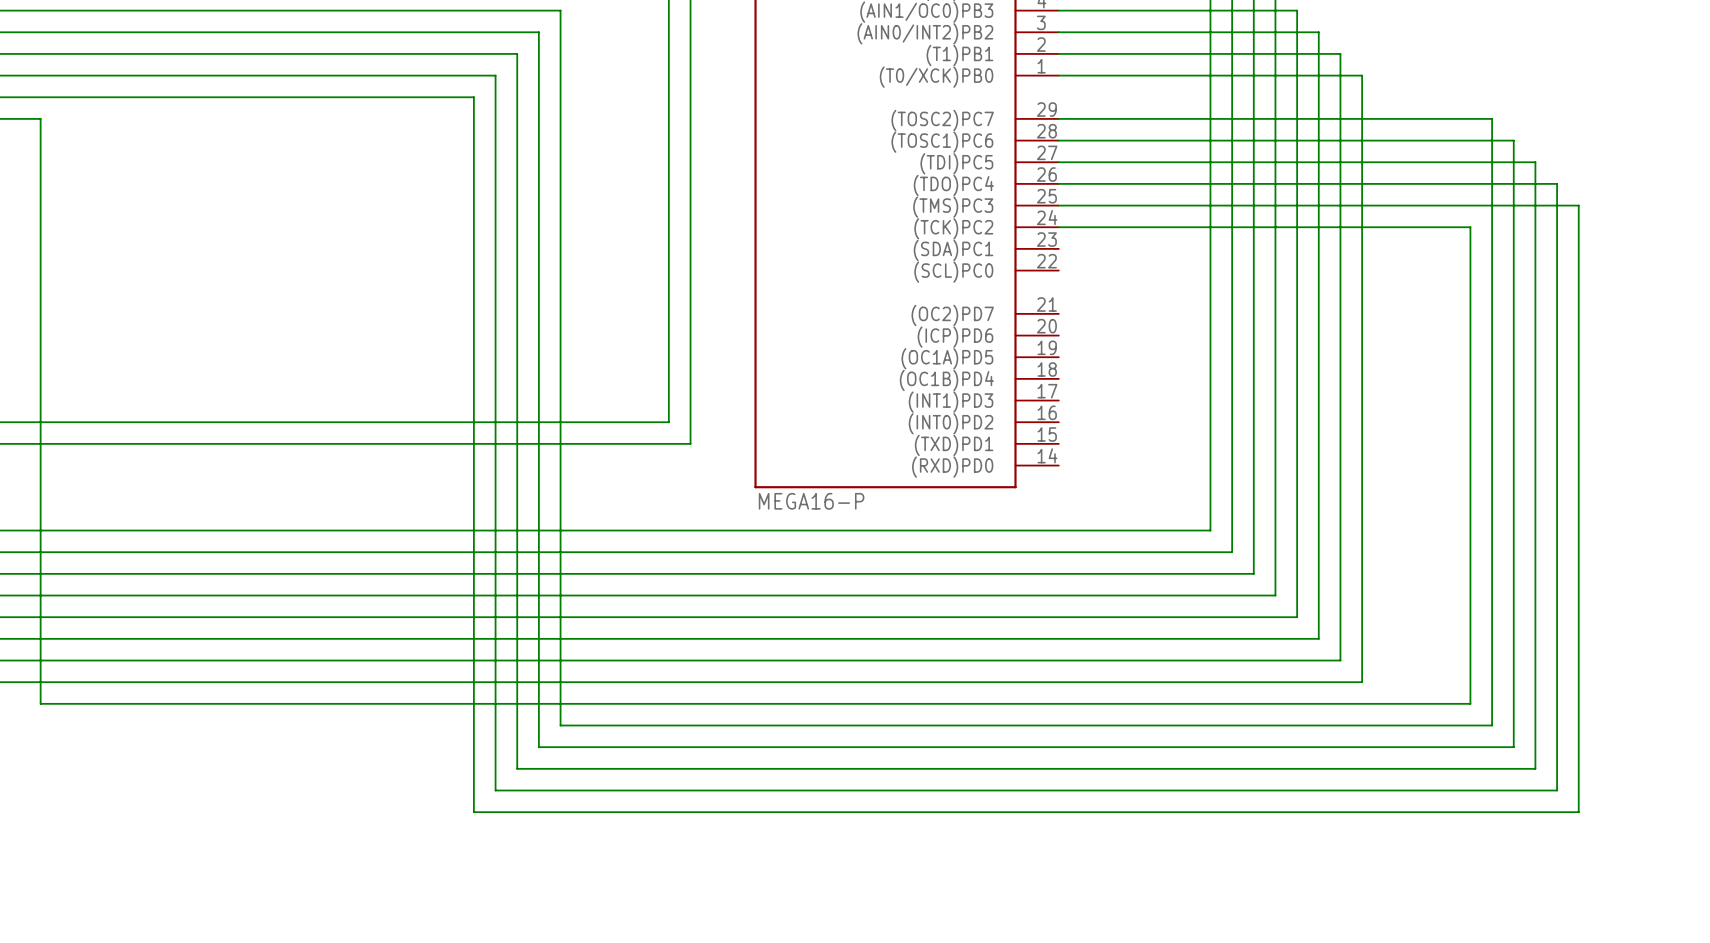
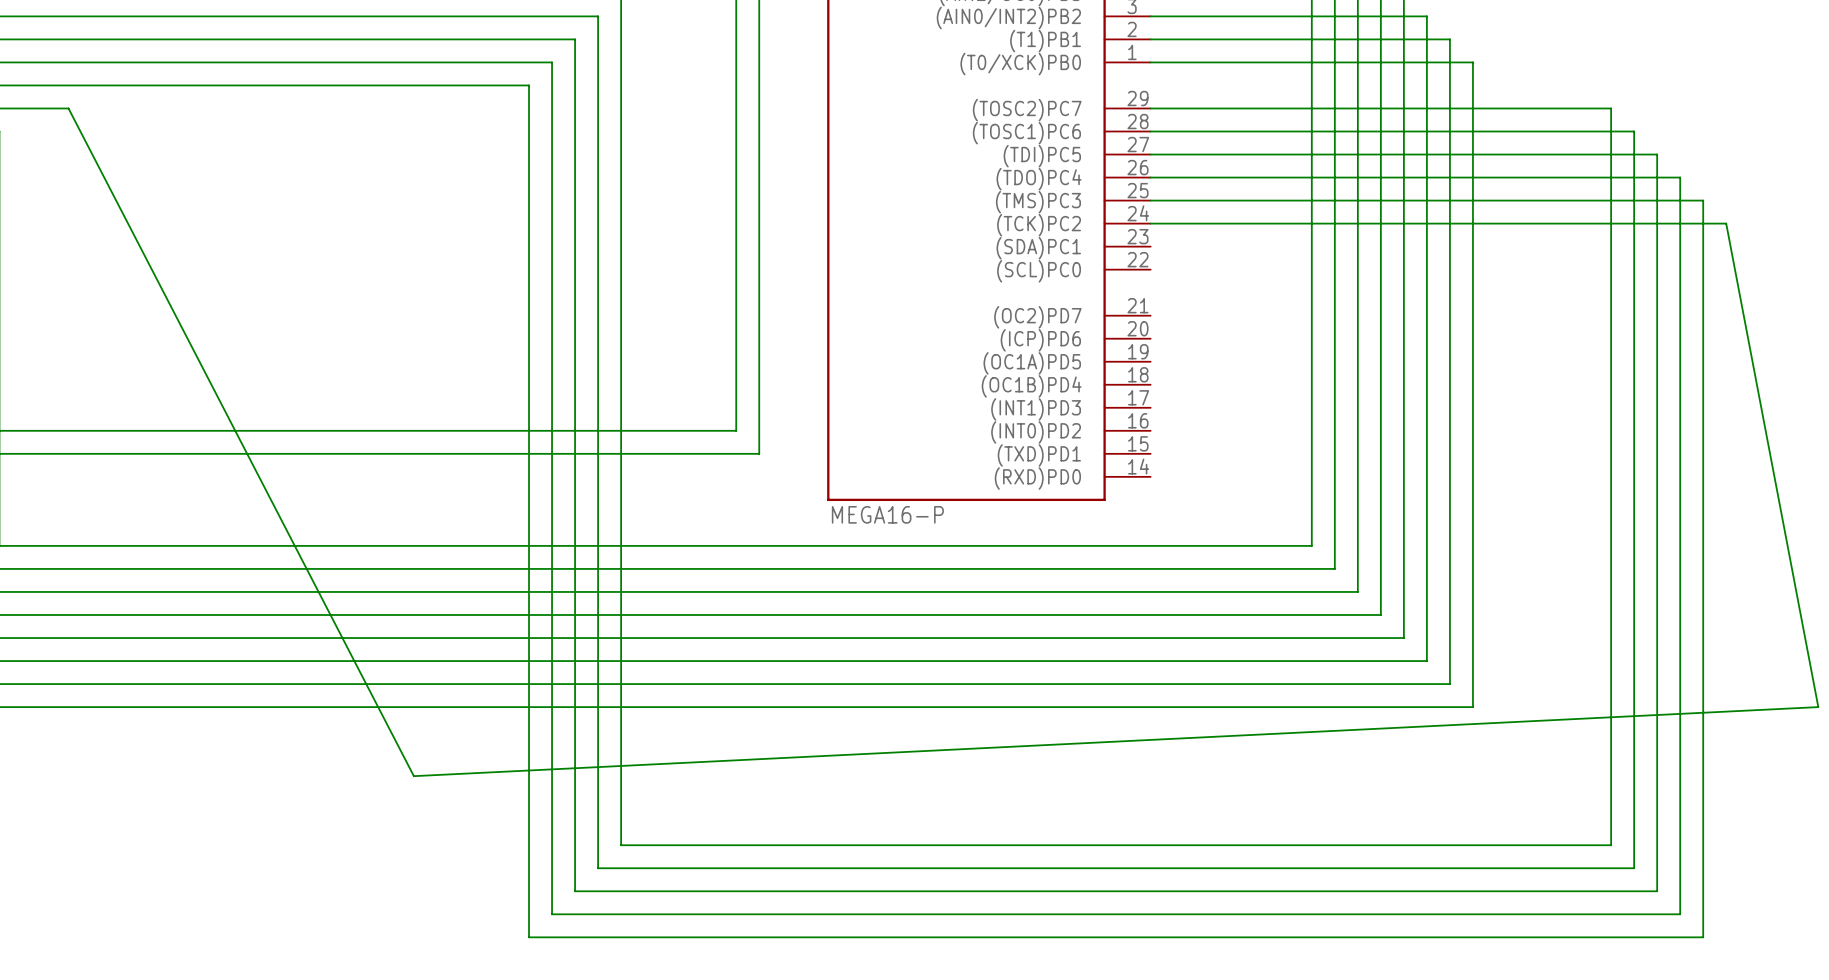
wire: (40, 118) (40, 703) (1470, 703) (1470, 227) -> (68, 108) (413, 776) (1818, 707) (1726, 223) (1588, 223)
wire: (560, 725) (1492, 725) -> none
wire: (538, 747) (1513, 747) -> (598, 776) (598, 868) (1634, 868) (1634, 776)
wire: (517, 768) (1535, 768) -> (575, 799) (575, 891) (1657, 891) (1657, 799)
wire: (495, 790) (1557, 790) -> (552, 822) (552, 914) (1680, 914) (1680, 822)
wire: (473, 812) (560, 812) -> (621, 753) (621, 845)
wire: none -> (529, 845) (529, 937) (1703, 937) (1703, 845)
wire: (1492, 812) (1578, 812) -> (1611, 845) (1611, 753)

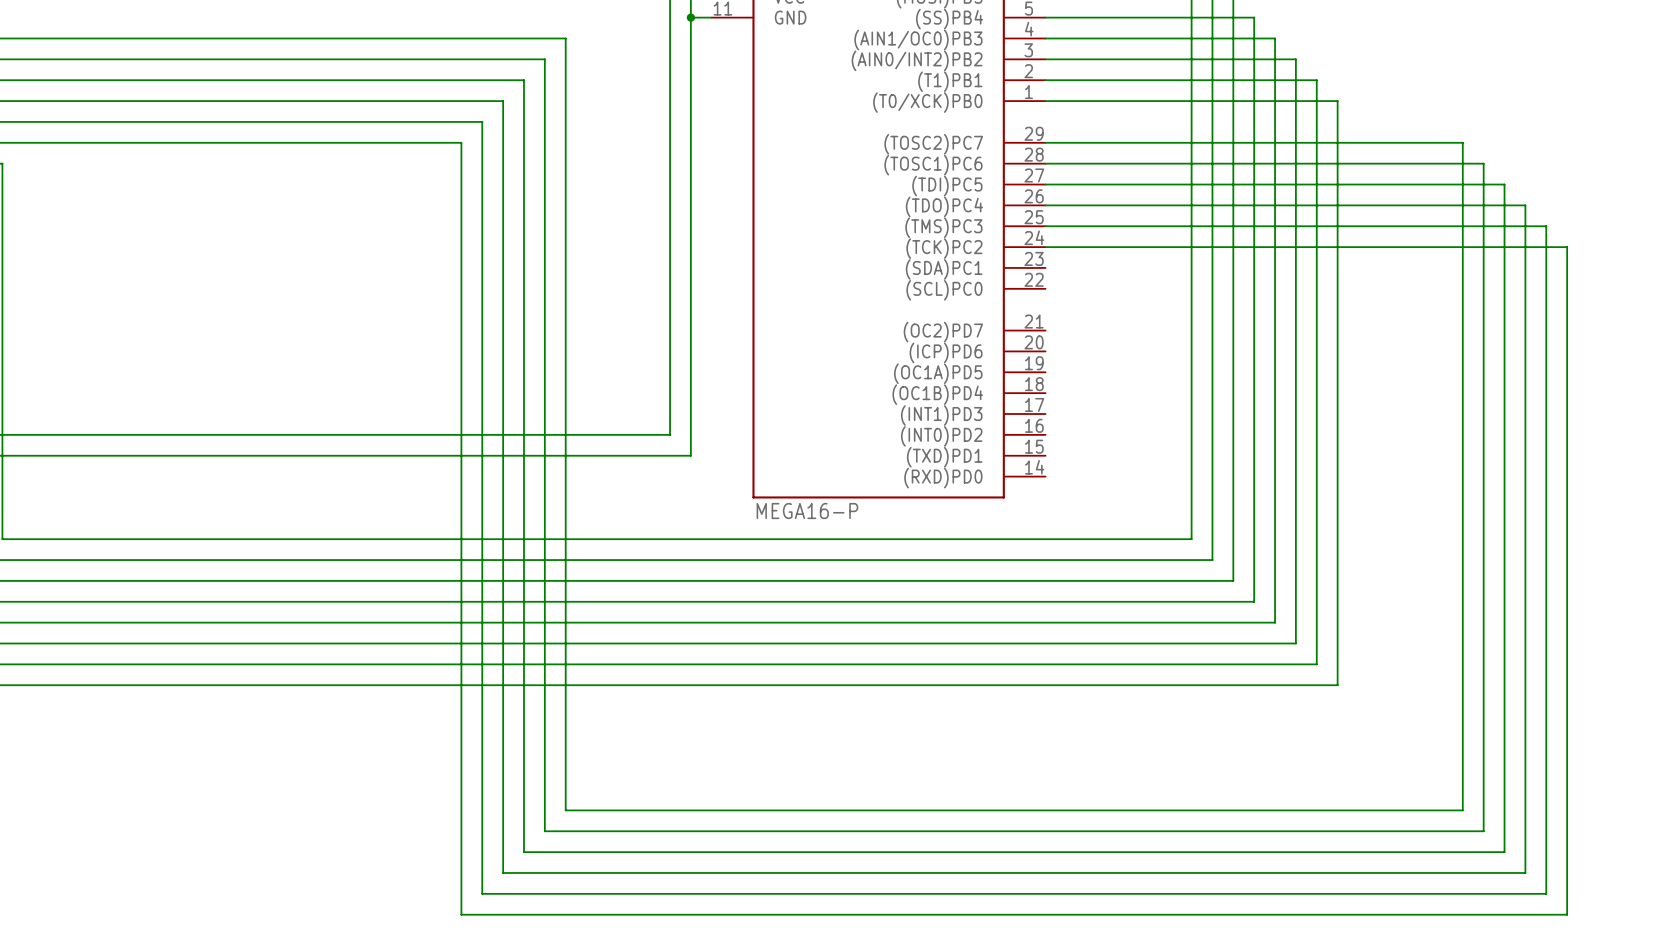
wire: (68, 108) (413, 776) (1818, 707) (1726, 223) -> (65, 142) (461, 142) (461, 914) (1567, 914) (1567, 247)

